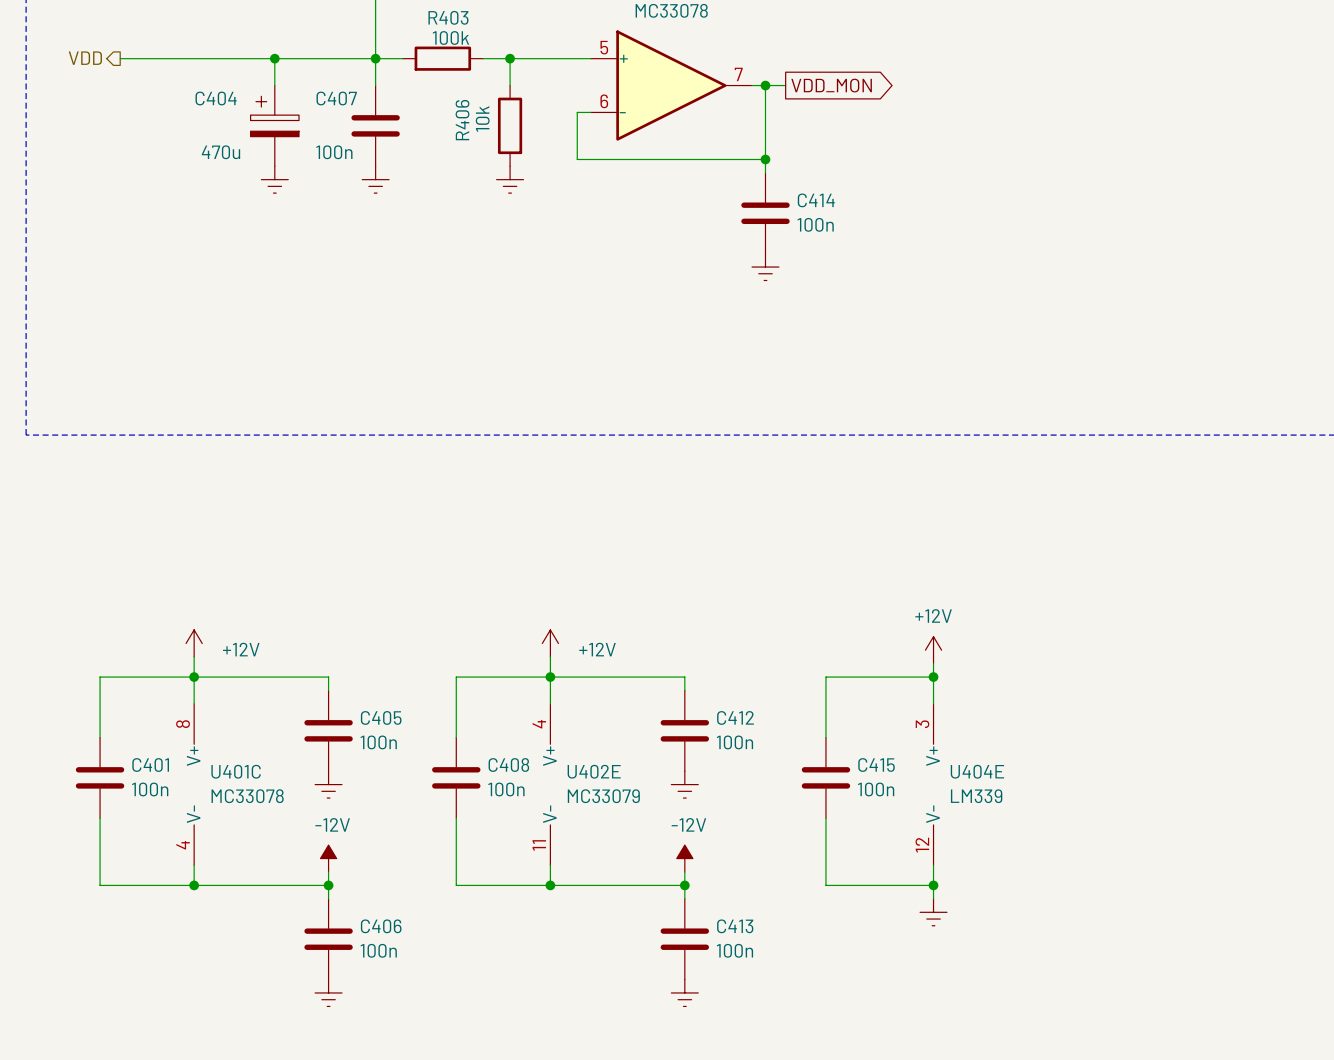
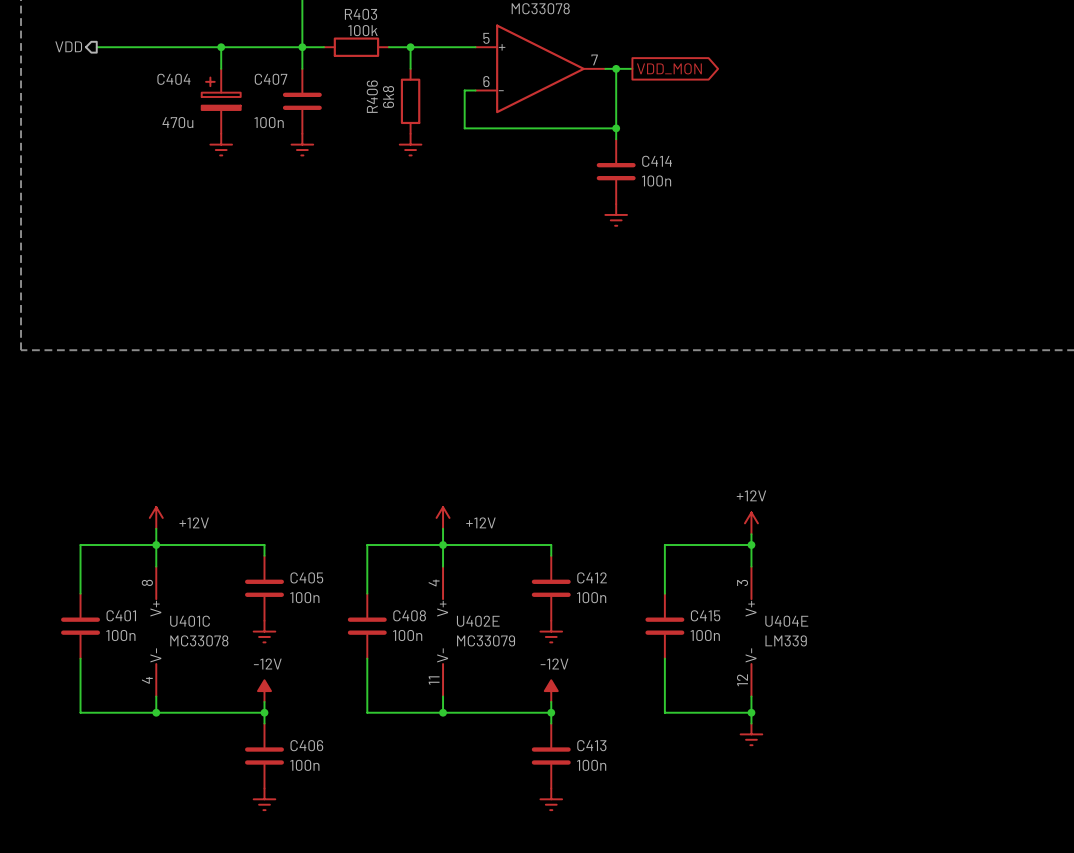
R406 value: 10k (482, 119) -> 6k8 (388, 96)

